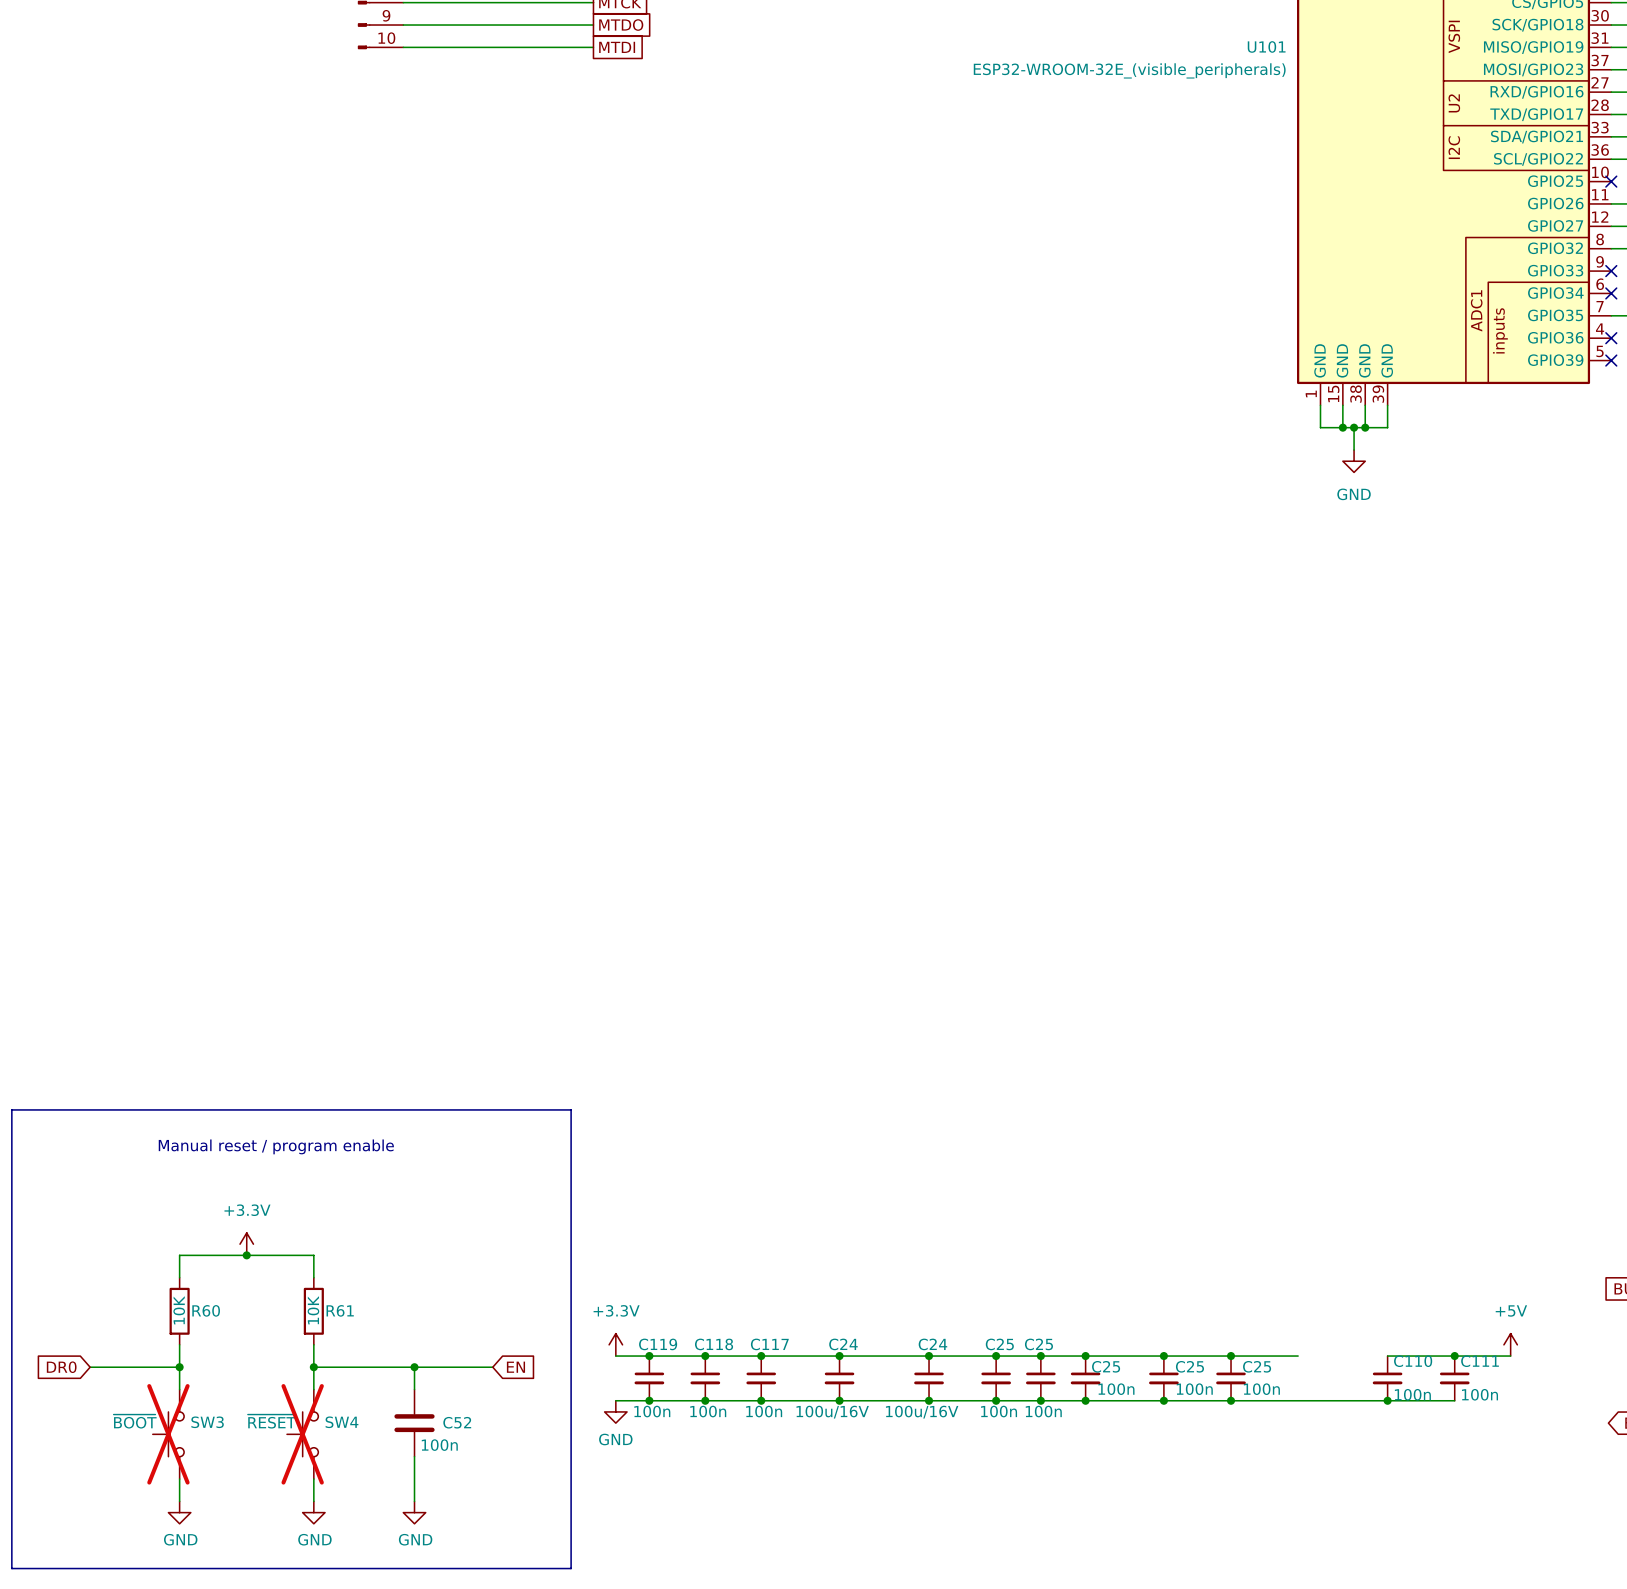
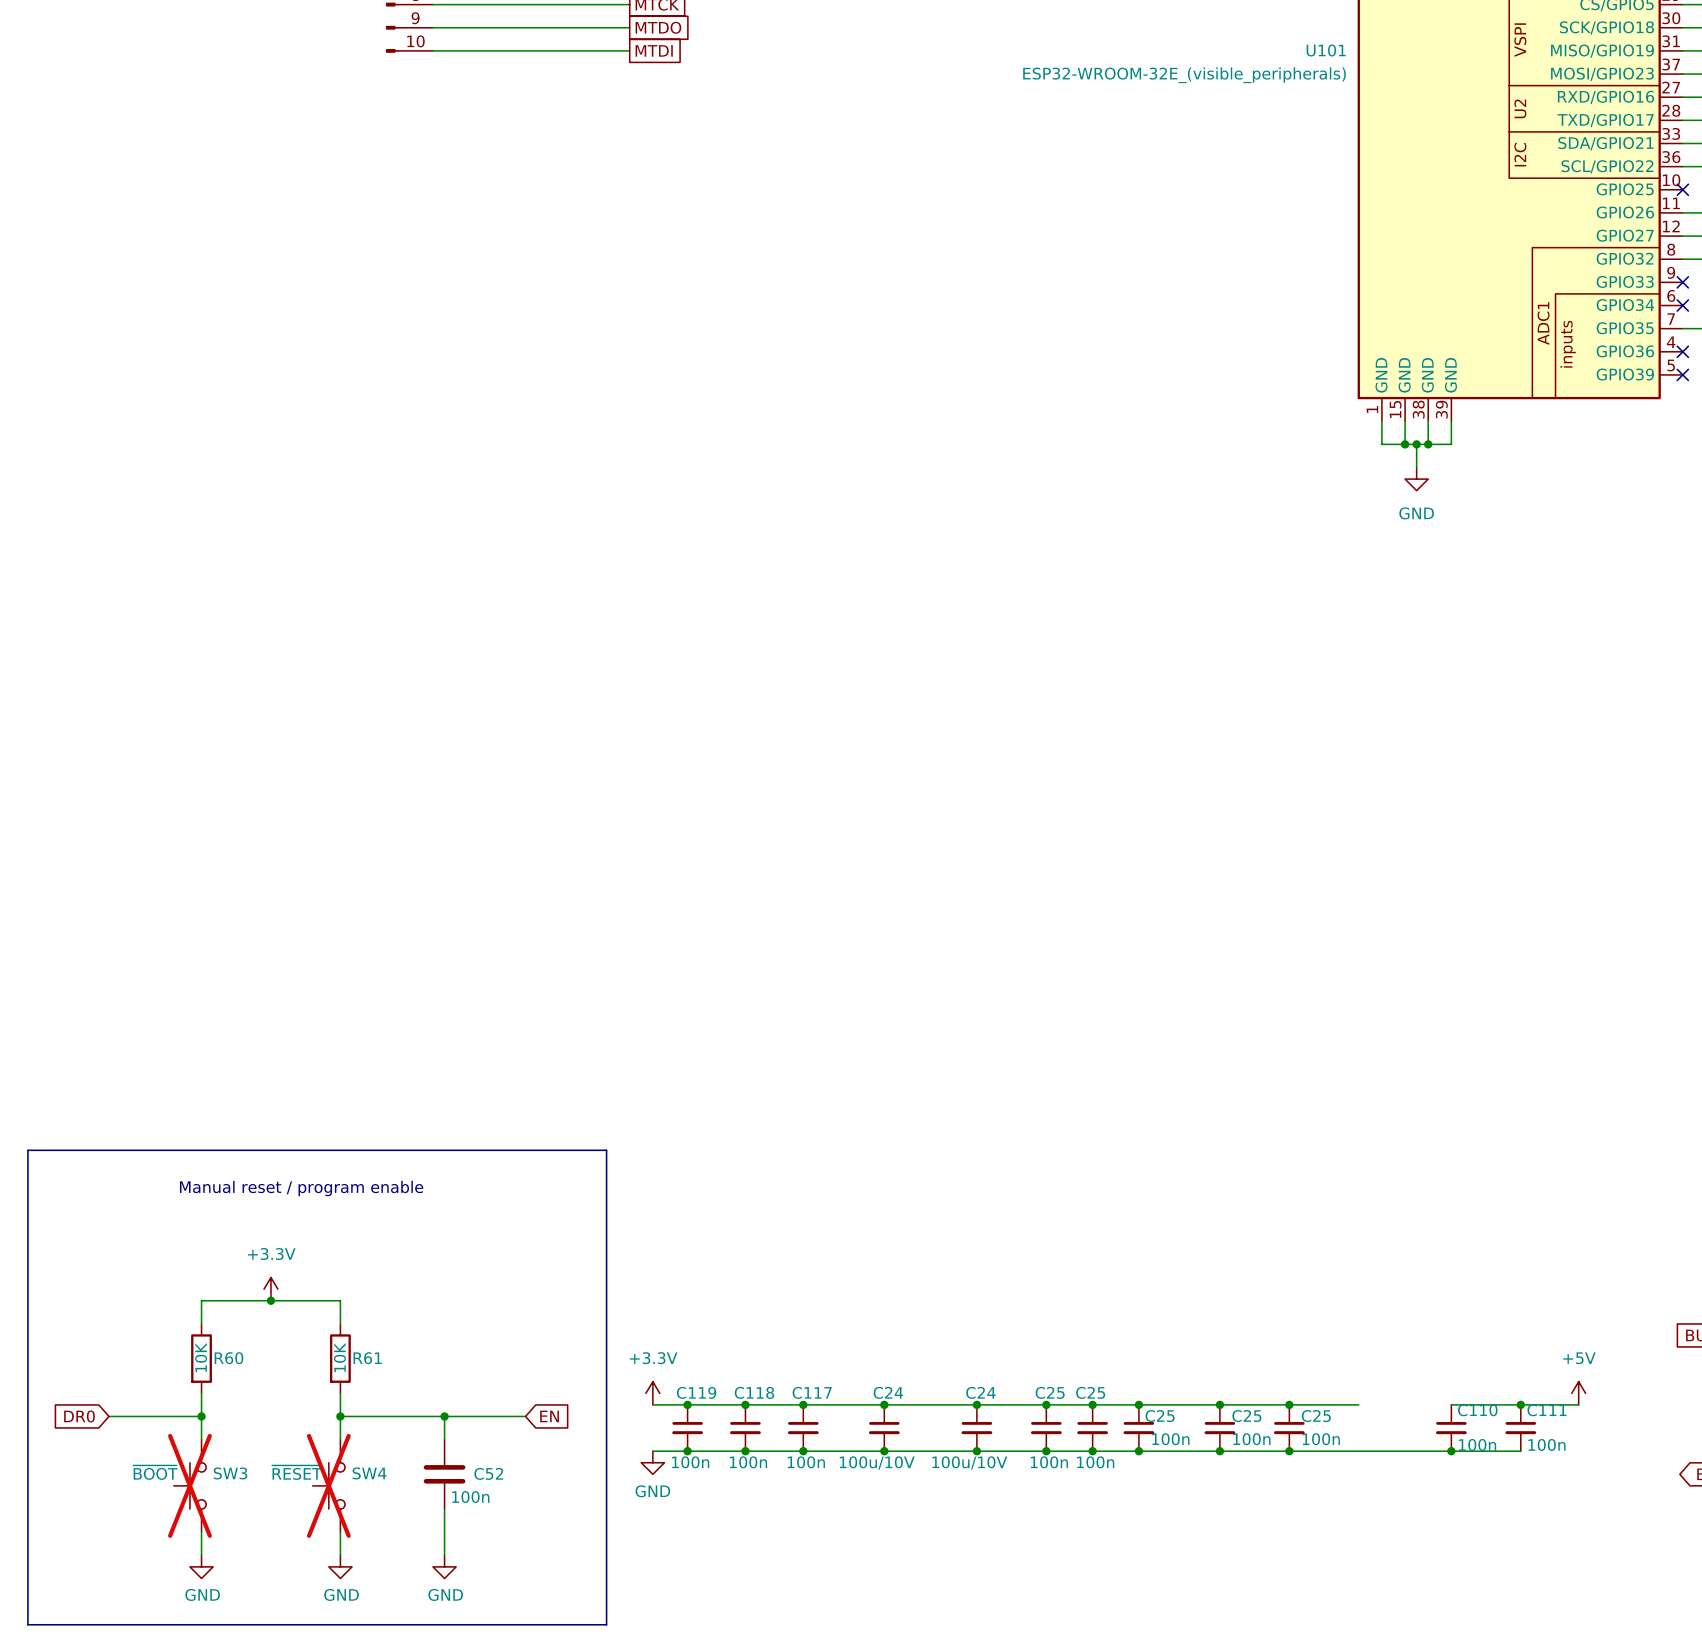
C24 value: 100u/16V (832, 1412) -> 100u/10V (877, 1462)
C24 value: 100u/16V (922, 1412) -> 100u/10V (969, 1462)

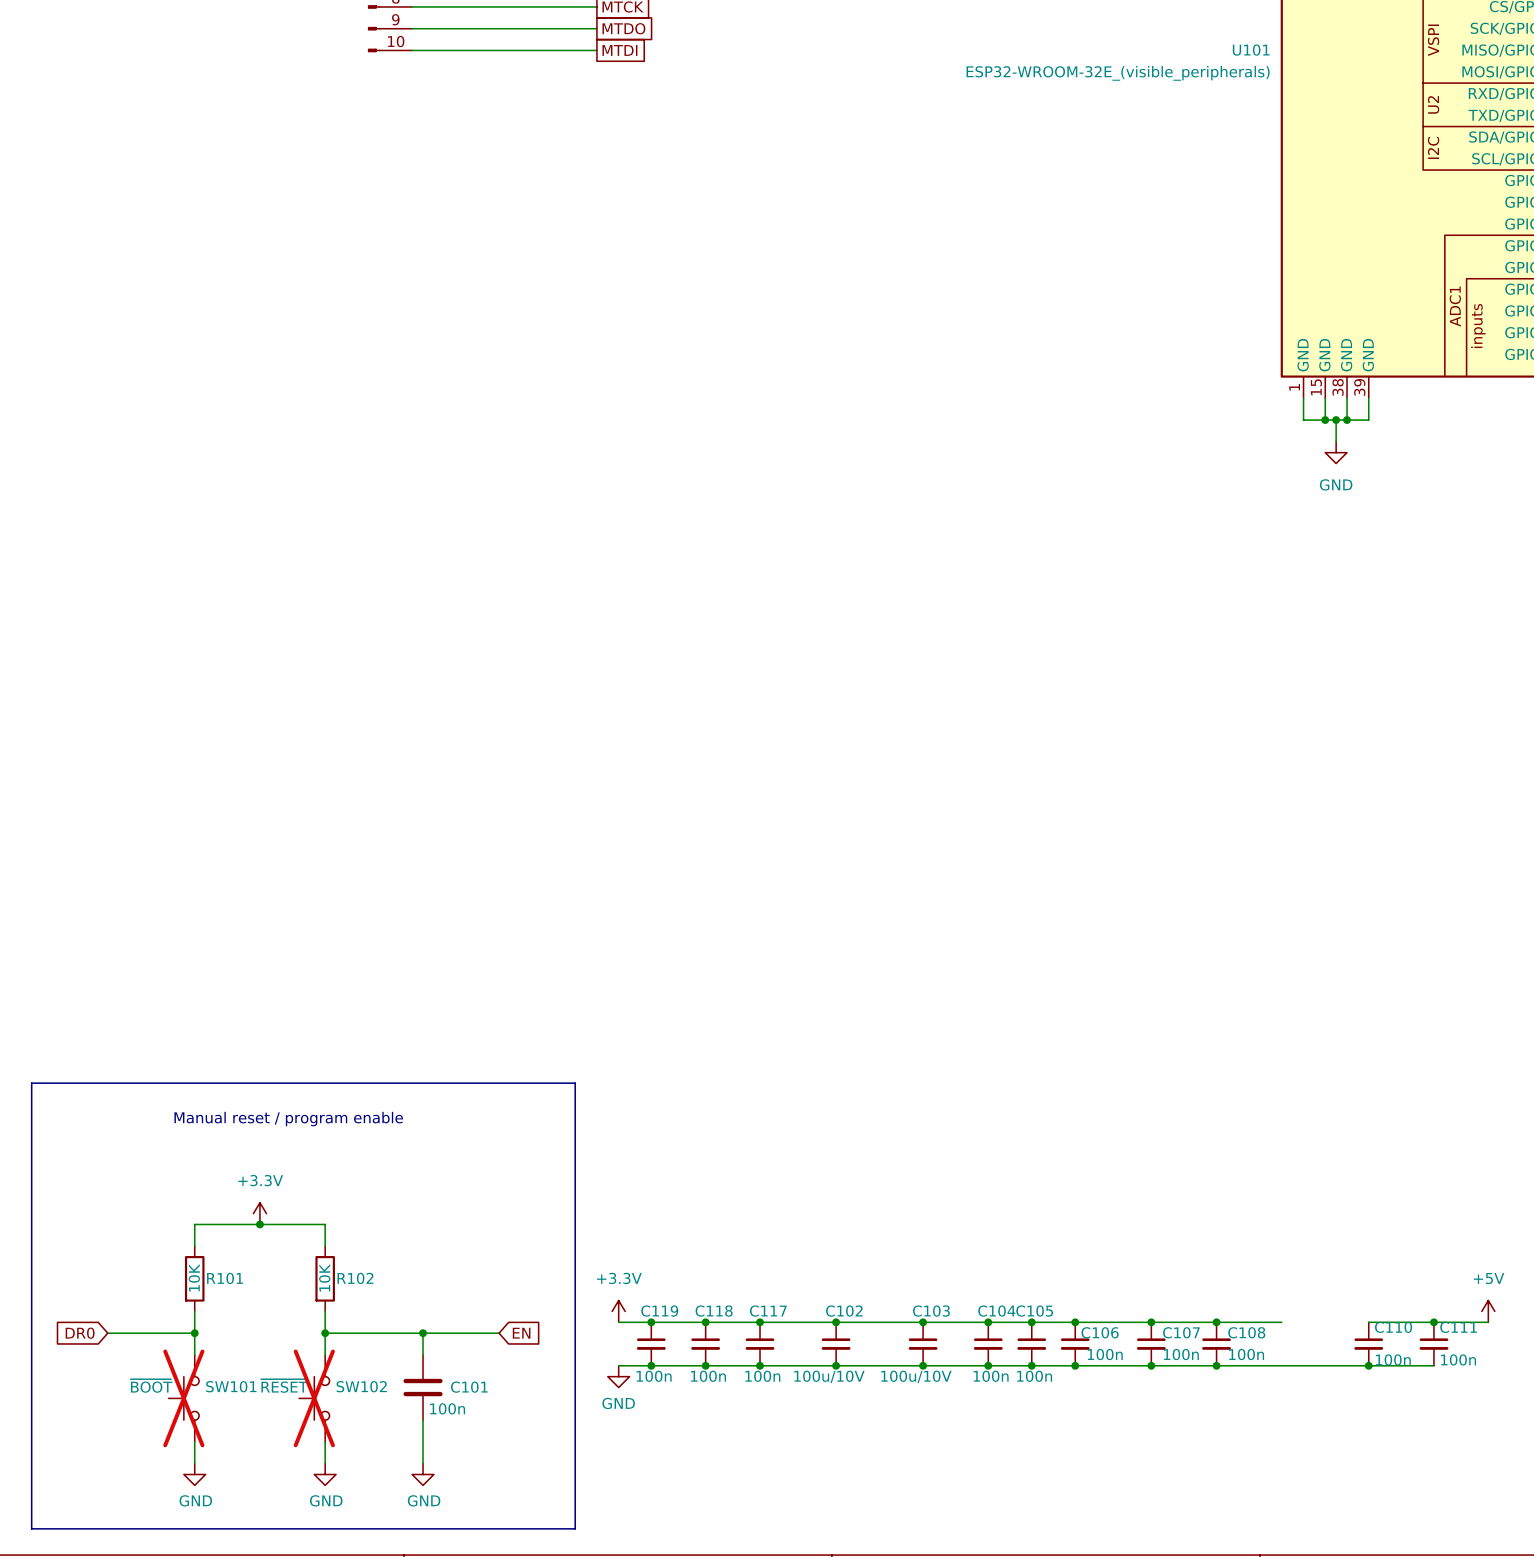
R60 name: R60 (228, 1358) -> R101 (225, 1278)
R61 name: R61 (367, 1358) -> R102 (355, 1278)
C24 name: C24 (888, 1392) -> C102 (844, 1311)
C24 name: C24 (980, 1392) -> C103 (931, 1311)
C25 name: C25 (1050, 1392) -> C104 (996, 1311)
C25 name: C25 (1090, 1392) -> C105 (1034, 1311)
C25 name: C25 (1160, 1416) -> C106 (1100, 1332)
C25 name: C25 (1246, 1416) -> C107 (1181, 1332)
C25 name: C25 (1316, 1416) -> C108 (1246, 1332)
SW3 name: SW3 (230, 1473) -> SW101 (231, 1386)
SW4 name: SW4 (369, 1473) -> SW102 (361, 1386)
C52 name: C52 (488, 1473) -> C101 (469, 1387)

